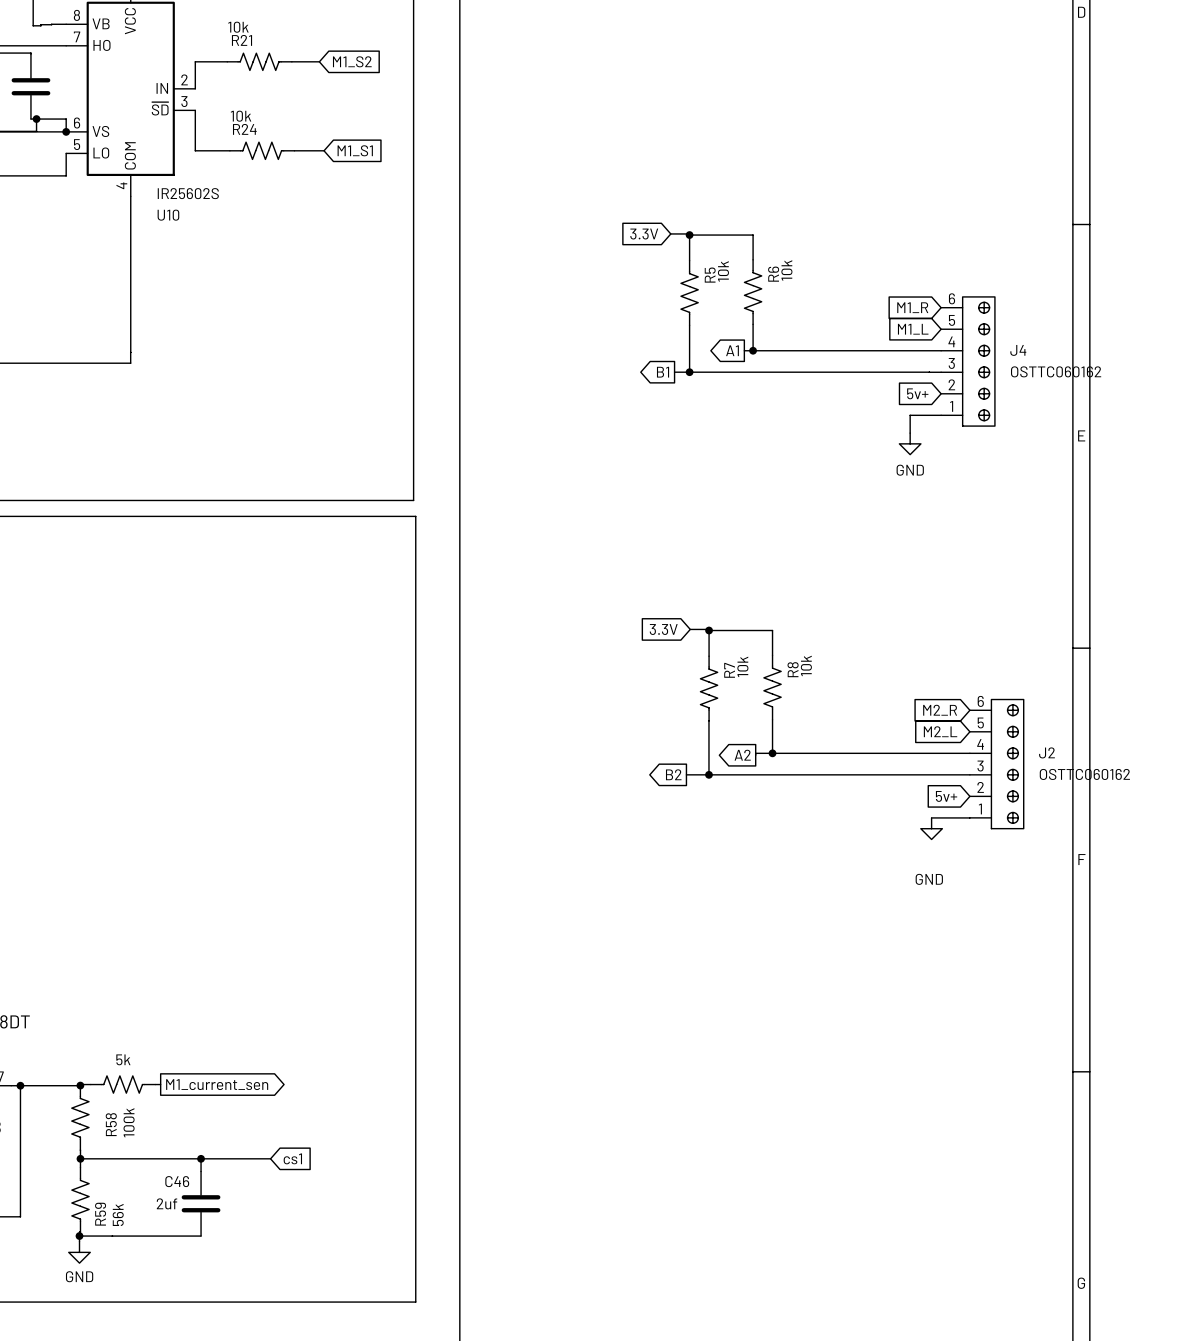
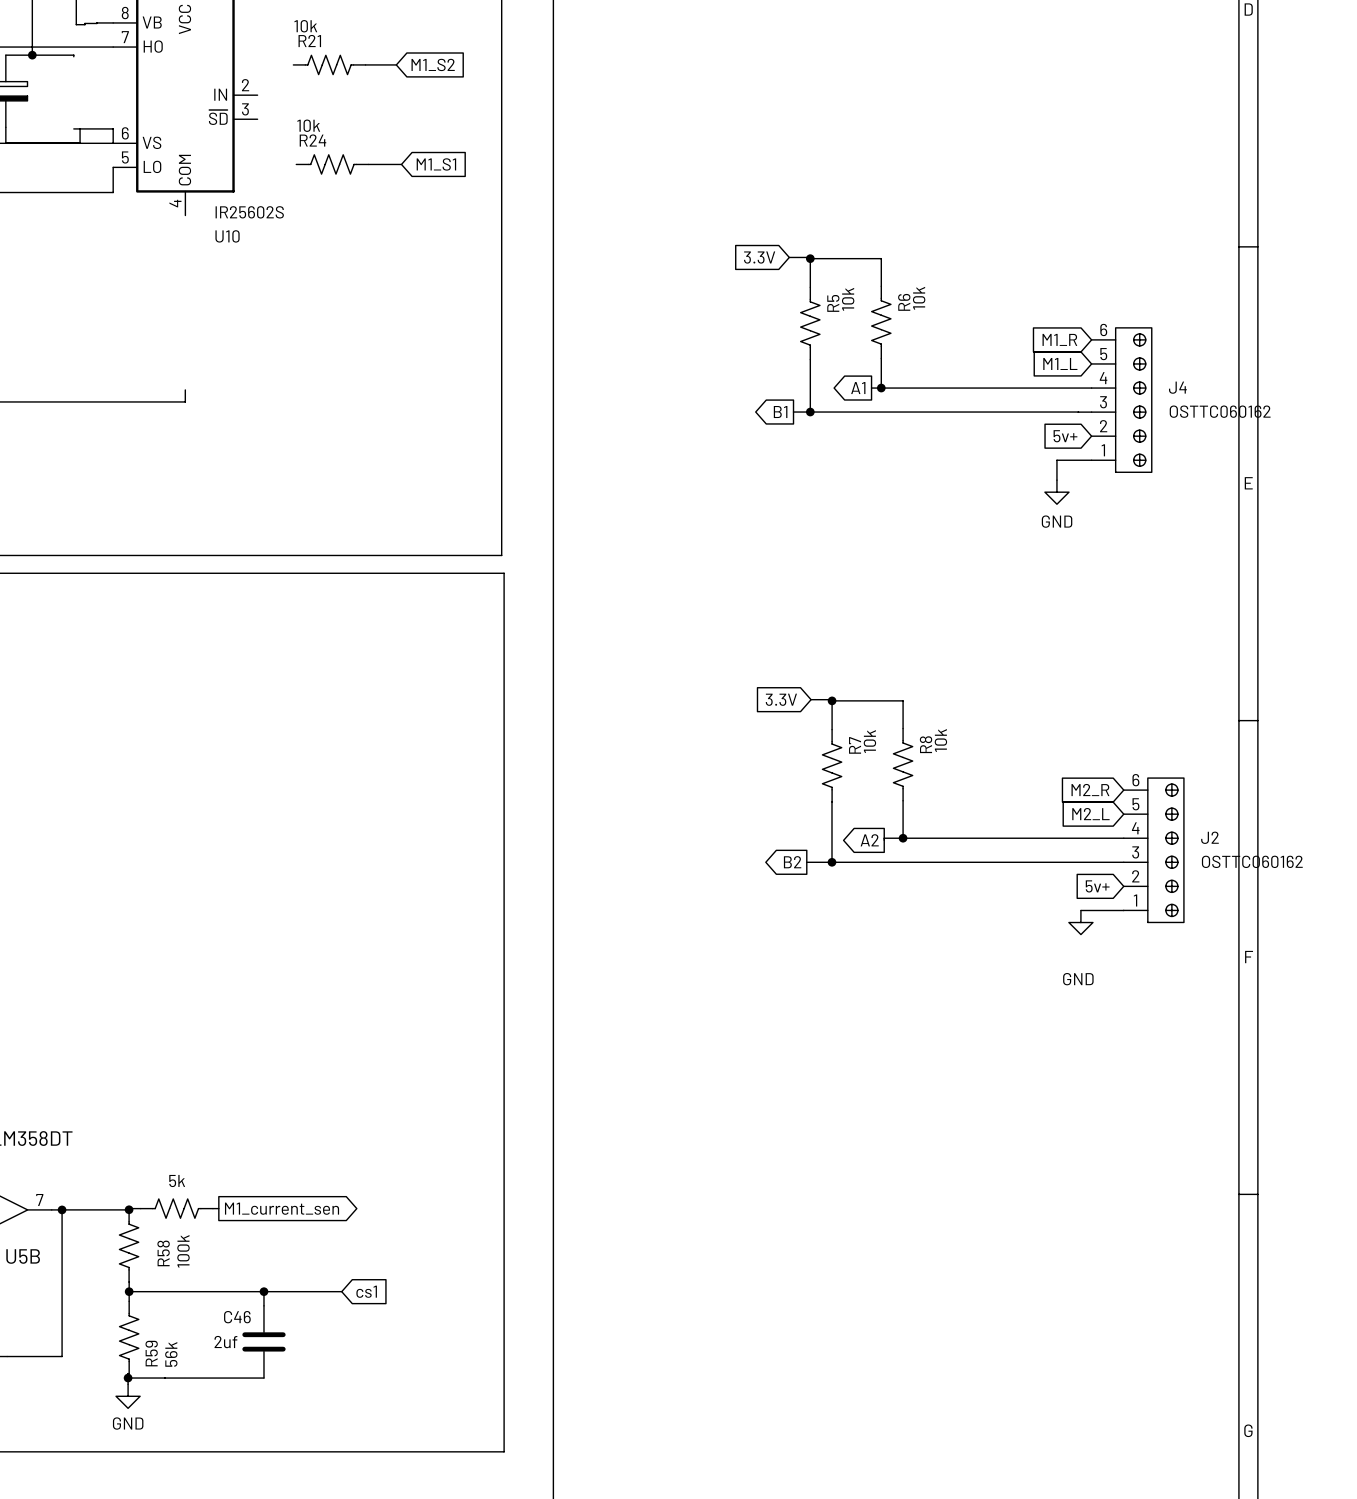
wire: (227, 61) (195, 61) (195, 88) -> none
part: (30, 86) -> none
wire: (195, 110) (195, 150) (229, 150) -> none
junction: (36, 119) -> none
junction: (66, 131) -> none
wire: (130, 196) (130, 352) -> none

